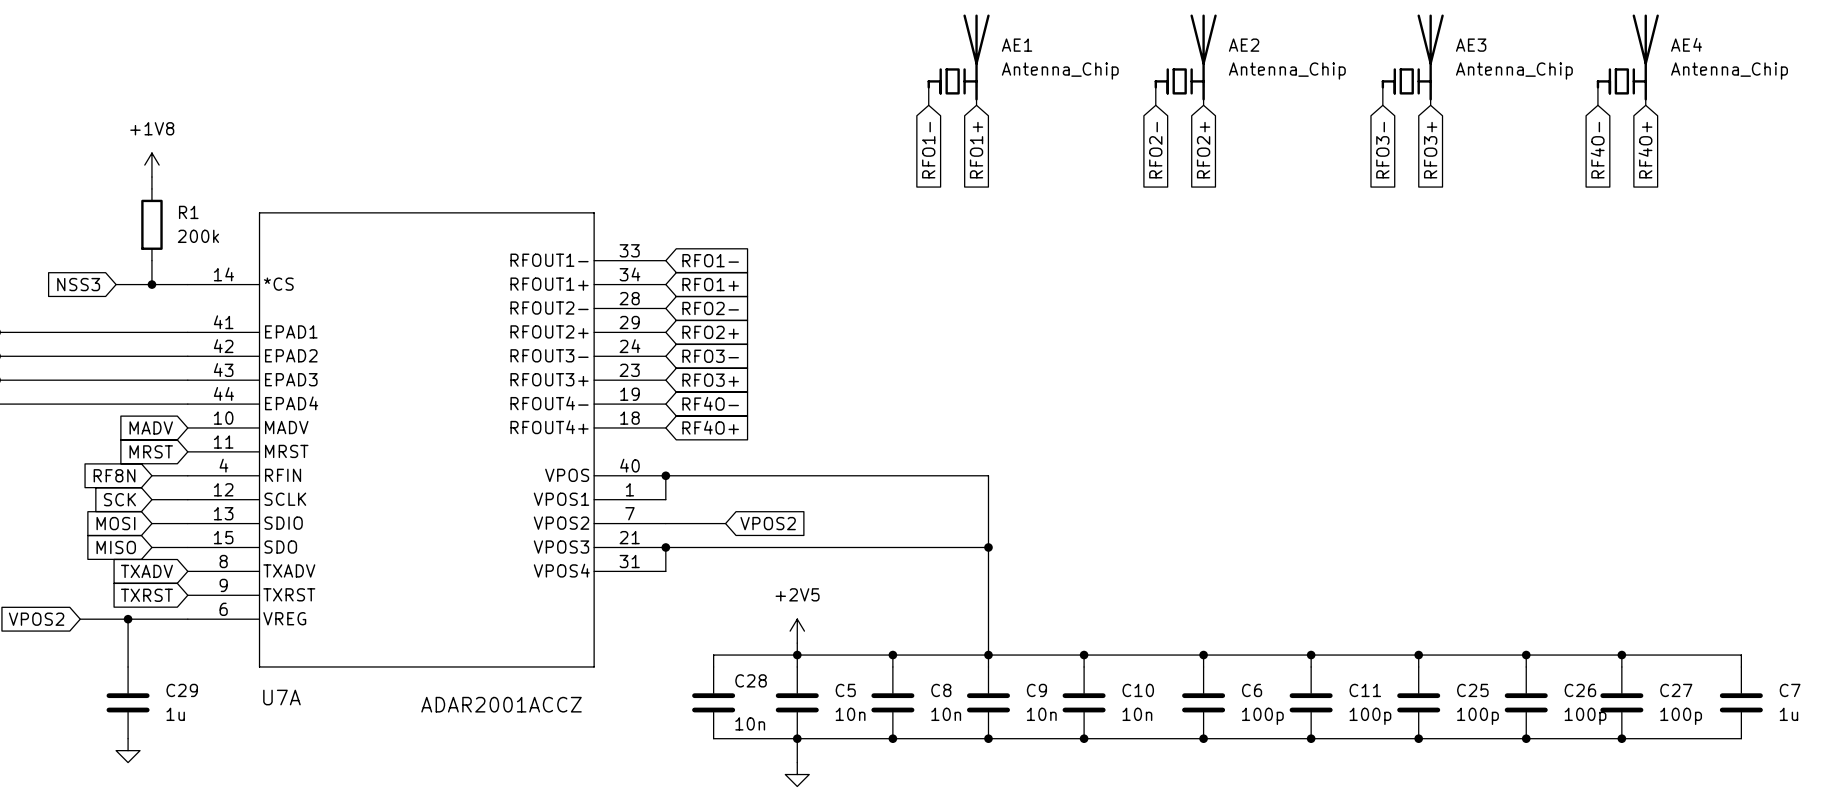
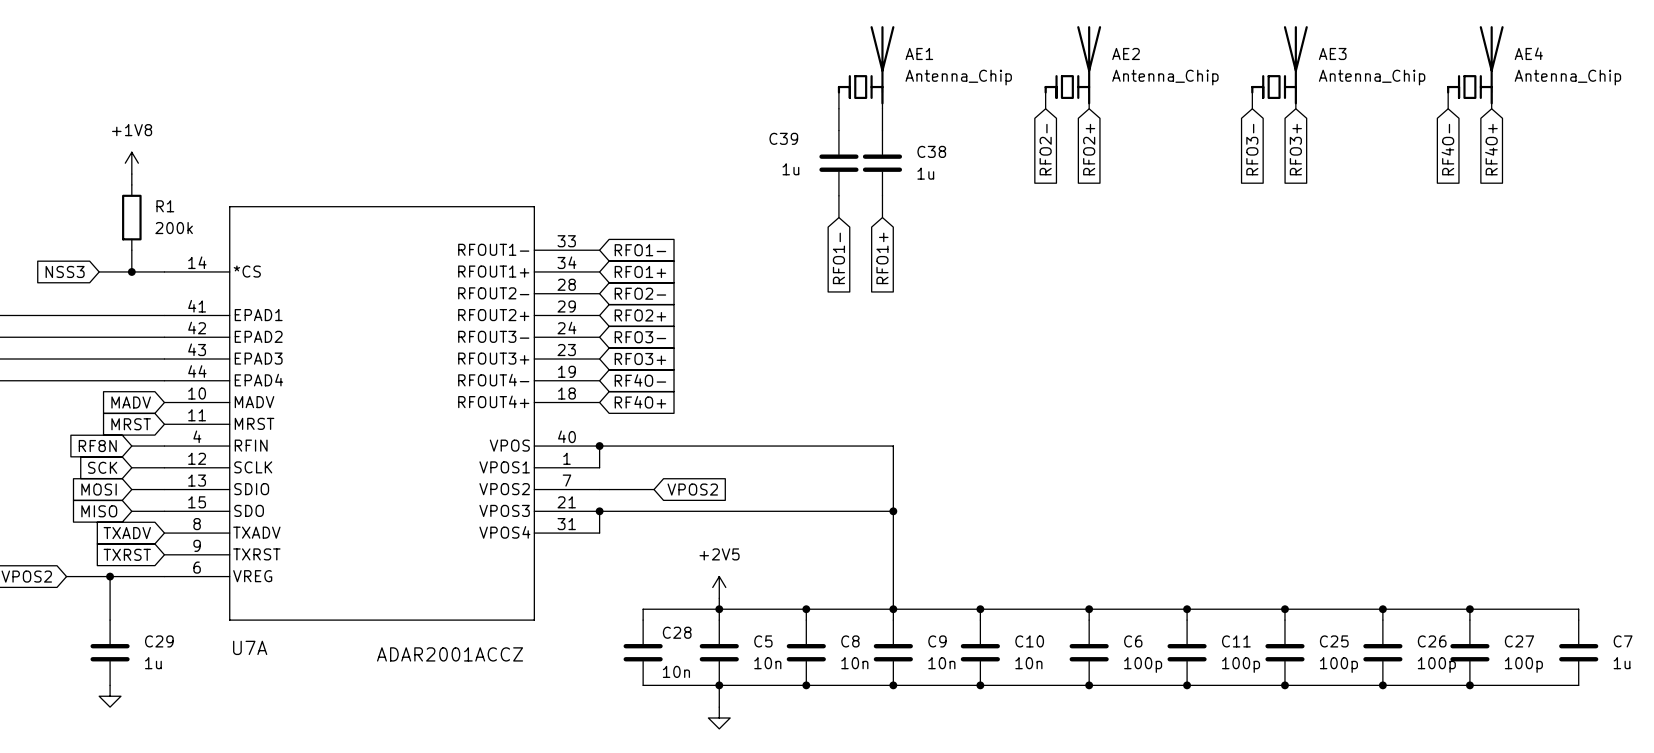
wire: none -> (838, 108) (838, 130)
wire: none -> (882, 108) (882, 130)
global label position: RFO1- (928, 150) -> RFO1- (838, 258)
global label position: RFO1+ (976, 150) -> RFO1+ (882, 258)
C39: none -> 1u (838, 163)
C38: none -> 1u (882, 163)
wire: none -> (838, 195) (838, 217)
wire: none -> (882, 195) (882, 217)

